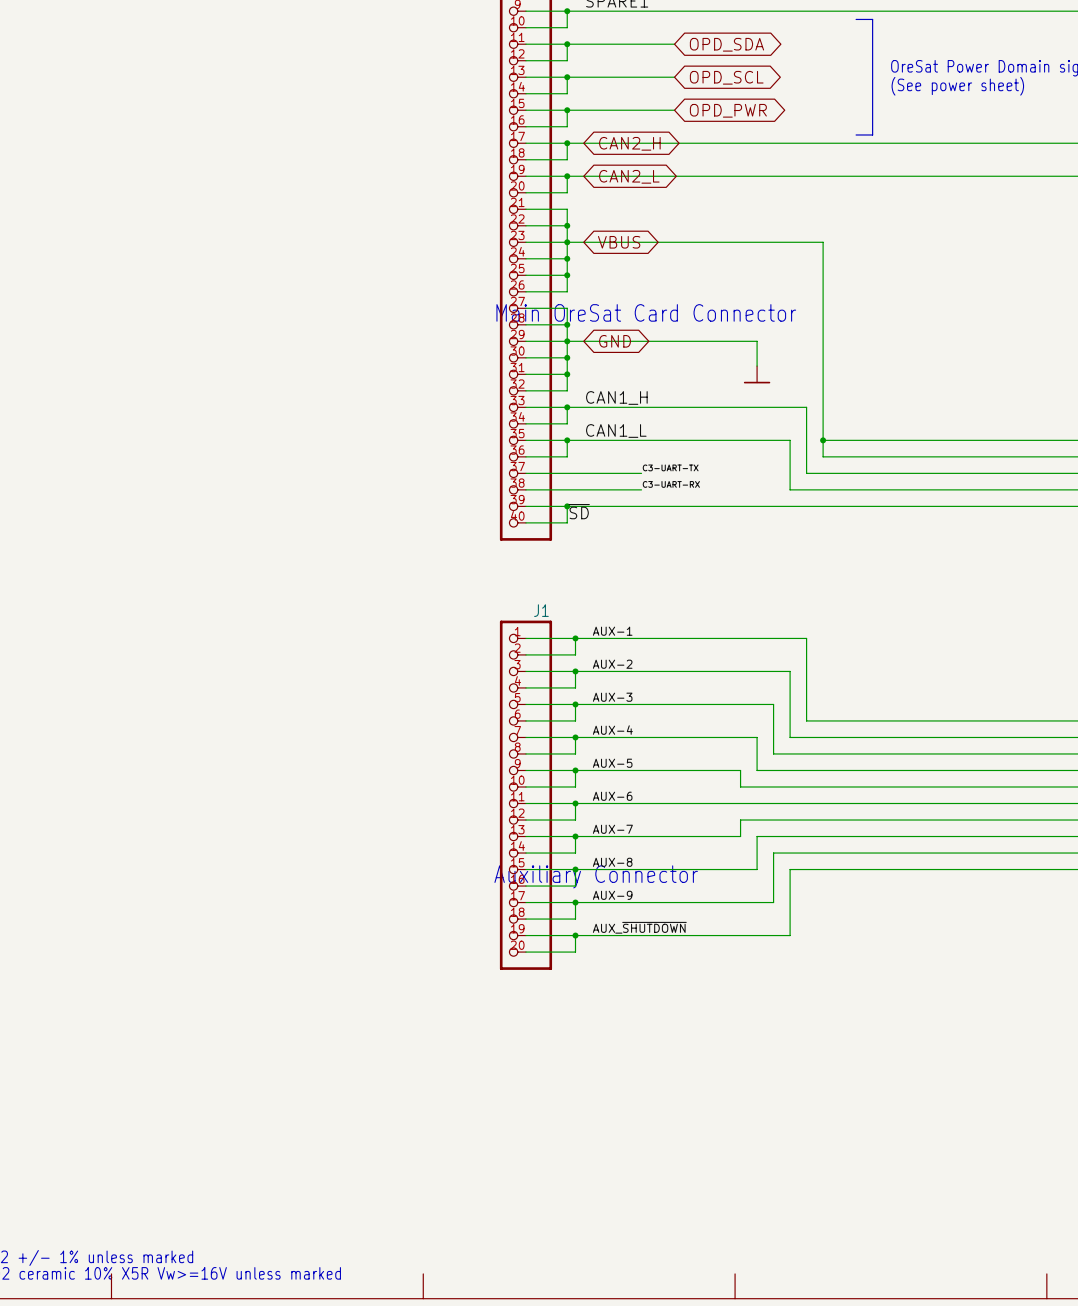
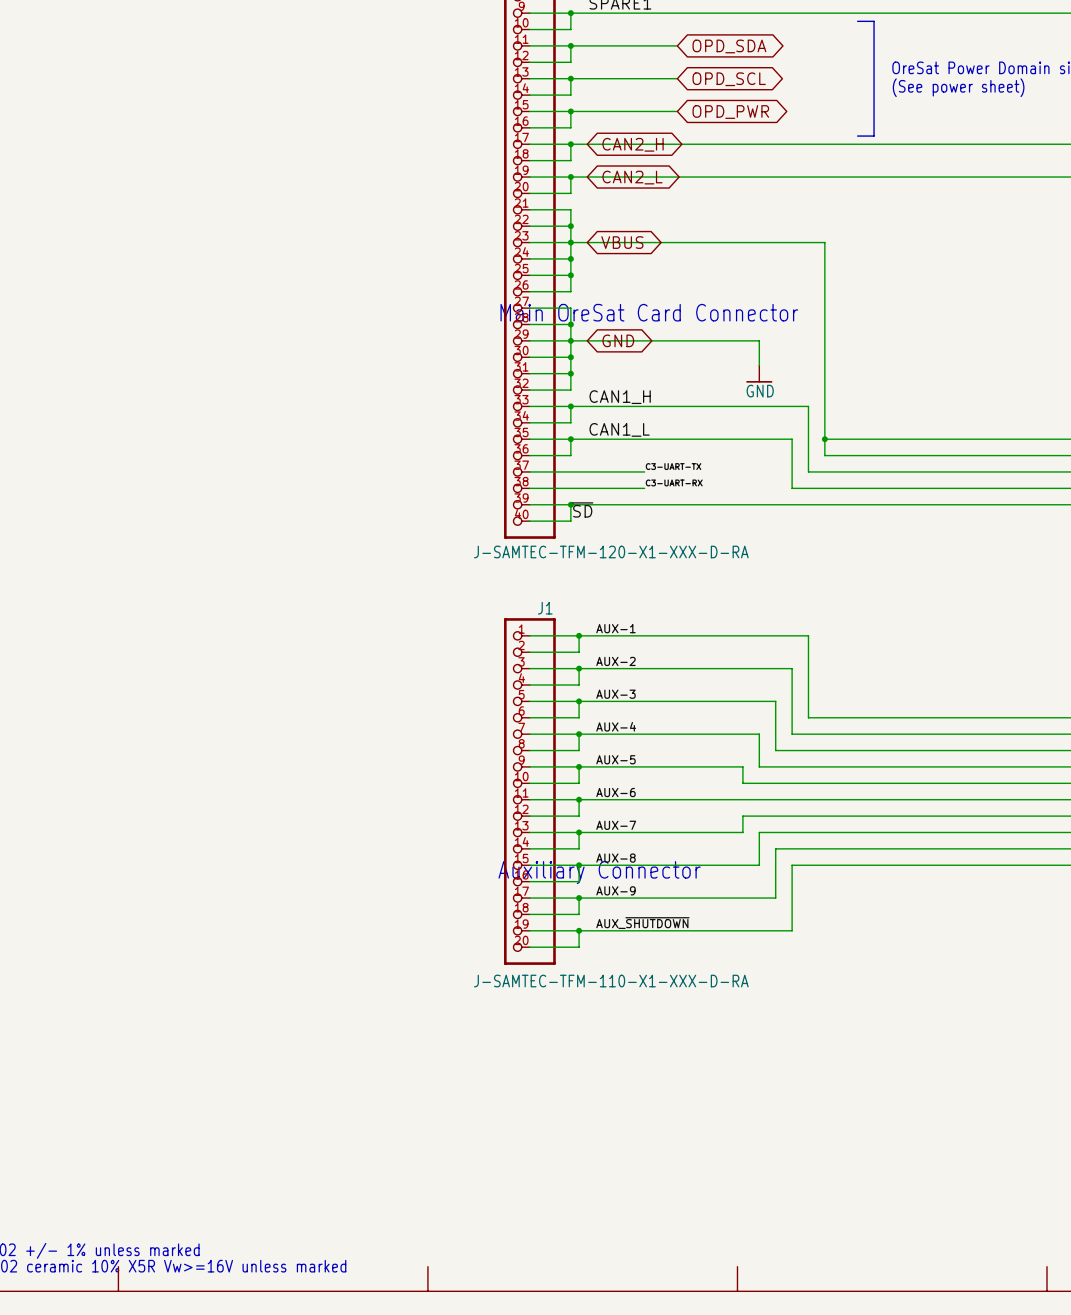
power symbol text: none -> GND (760, 391)
part value: none -> J-SAMTEC-TFM-120-X1-XXX-D-RA (611, 552)
J1 value: none -> J-SAMTEC-TFM-110-X1-XXX-D-RA (611, 981)

